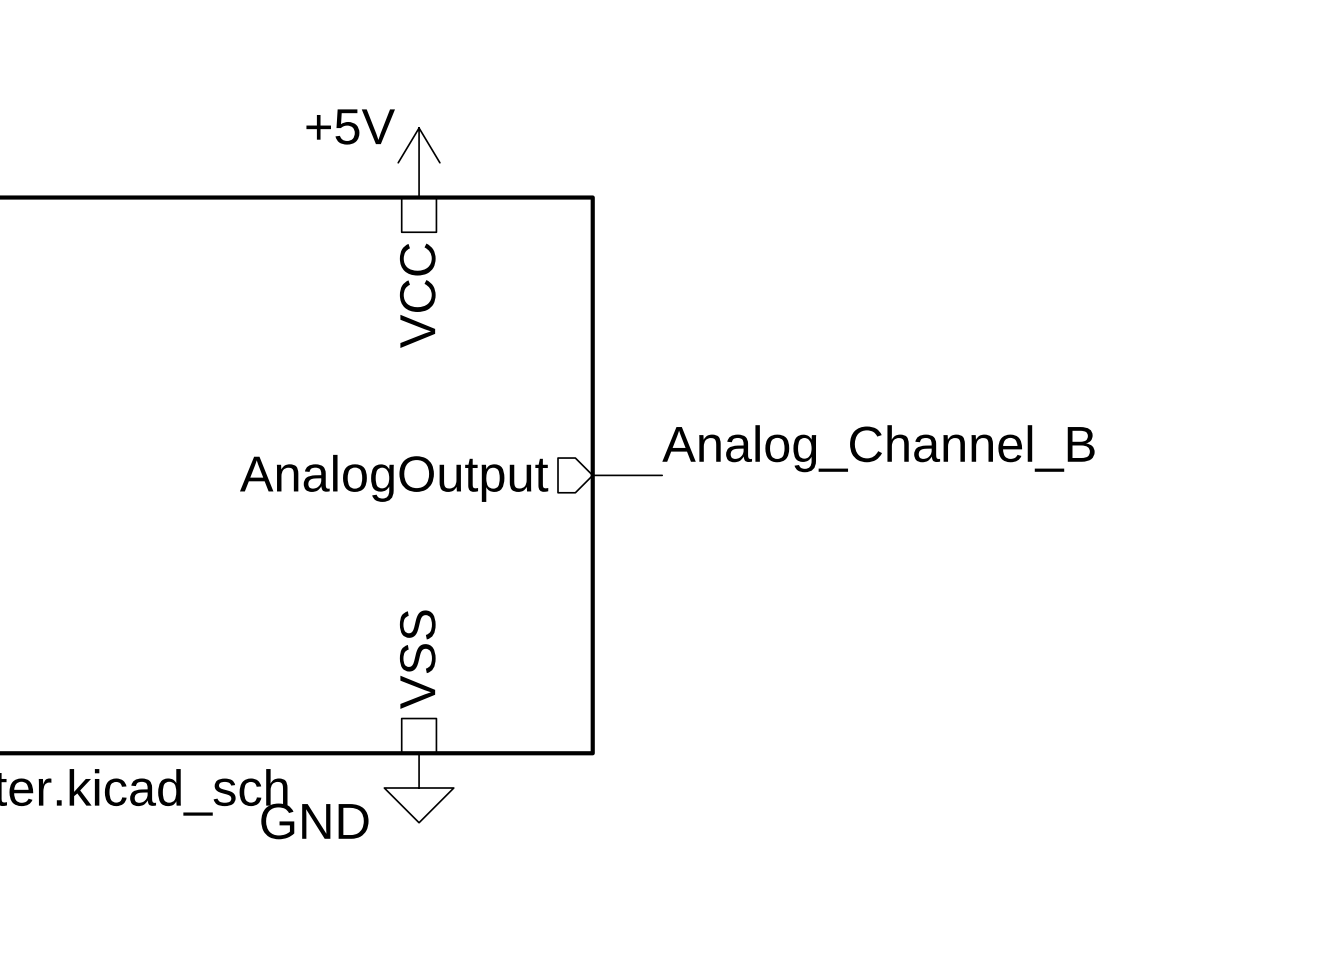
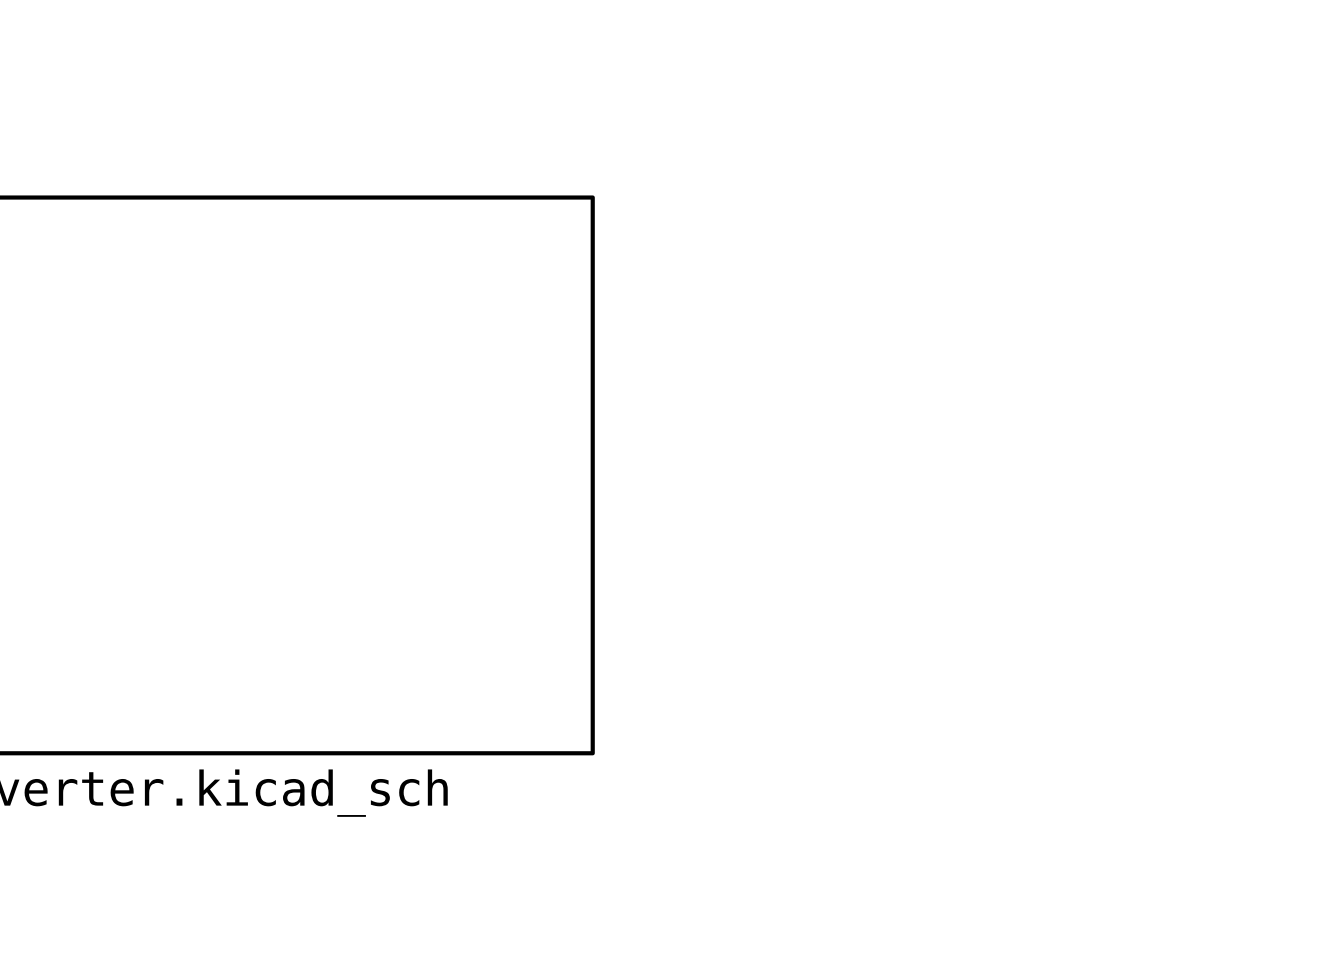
power symbol: +5V (419, 162) -> none
sheet pin: VCC (417, 295) -> none
label: Analog_Channel_B (878, 448) -> none
wire: (592, 475) (662, 475) -> none
sheet pin: AnalogOutput (394, 478) -> none
sheet pin: VSS (417, 659) -> none
power symbol: GND (419, 788) -> none

